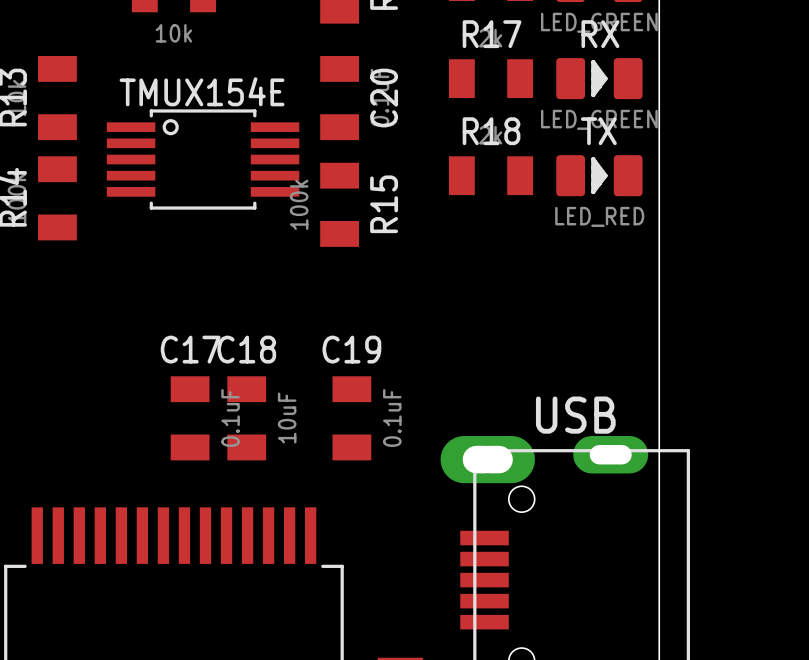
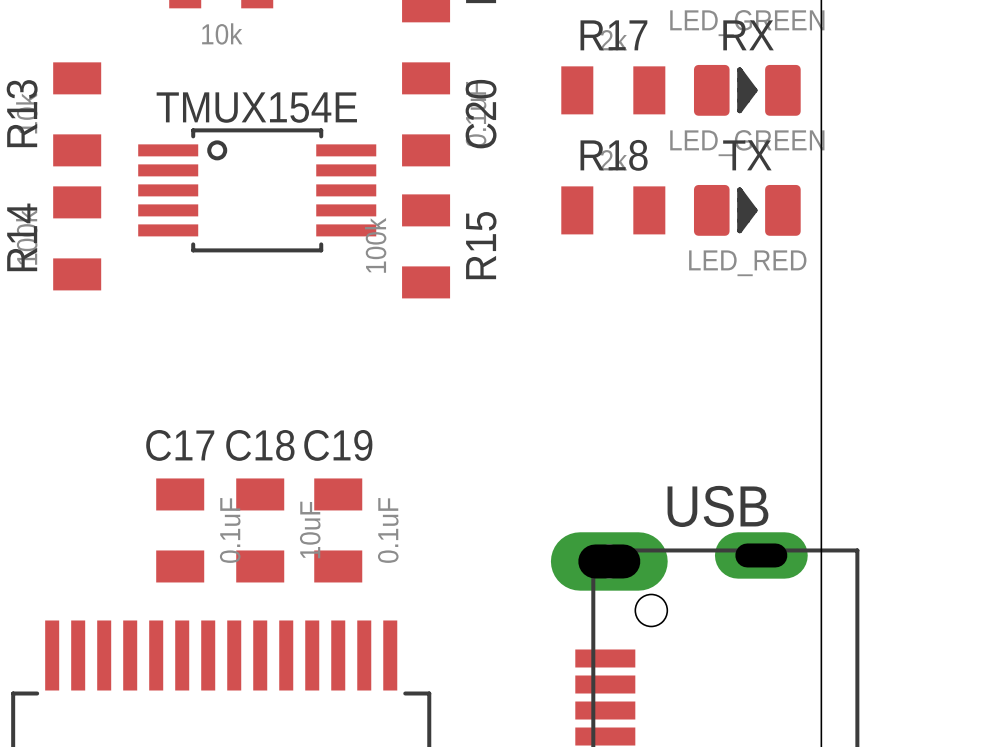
C17 position: (190, 418) -> (180, 530)
C18 position: (246, 418) -> (260, 530)
C19 position: (351, 418) -> (338, 530)

